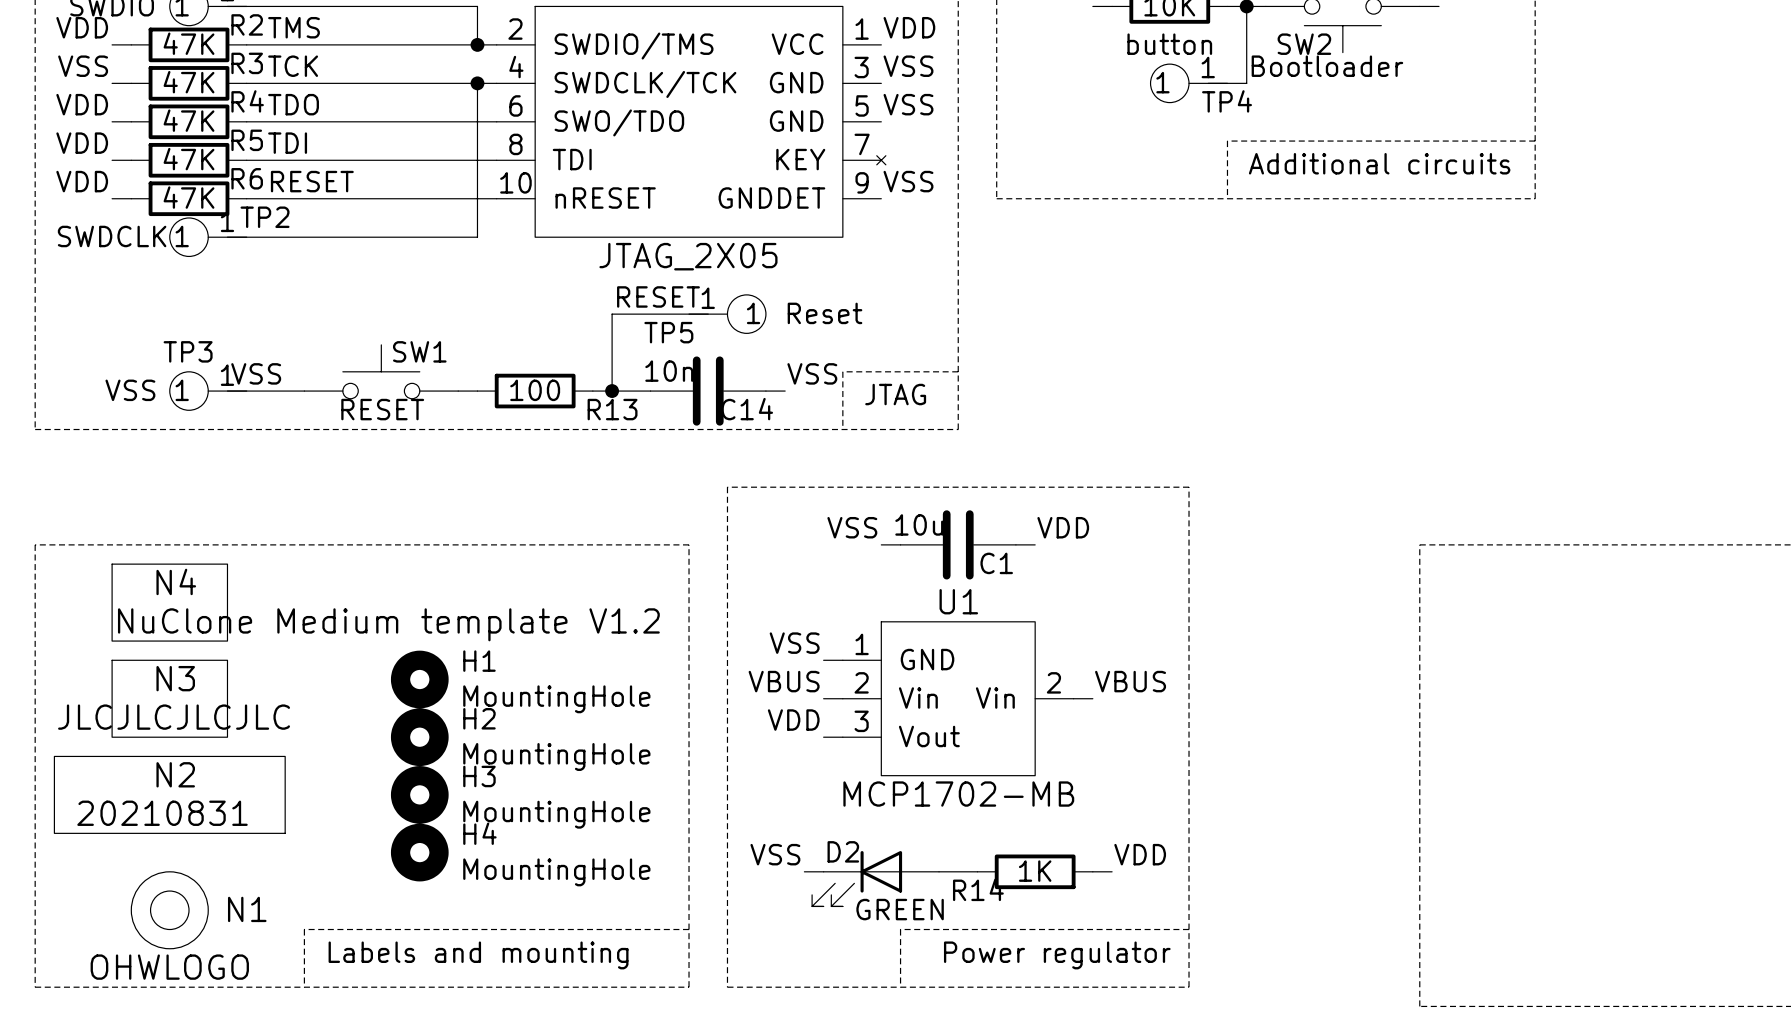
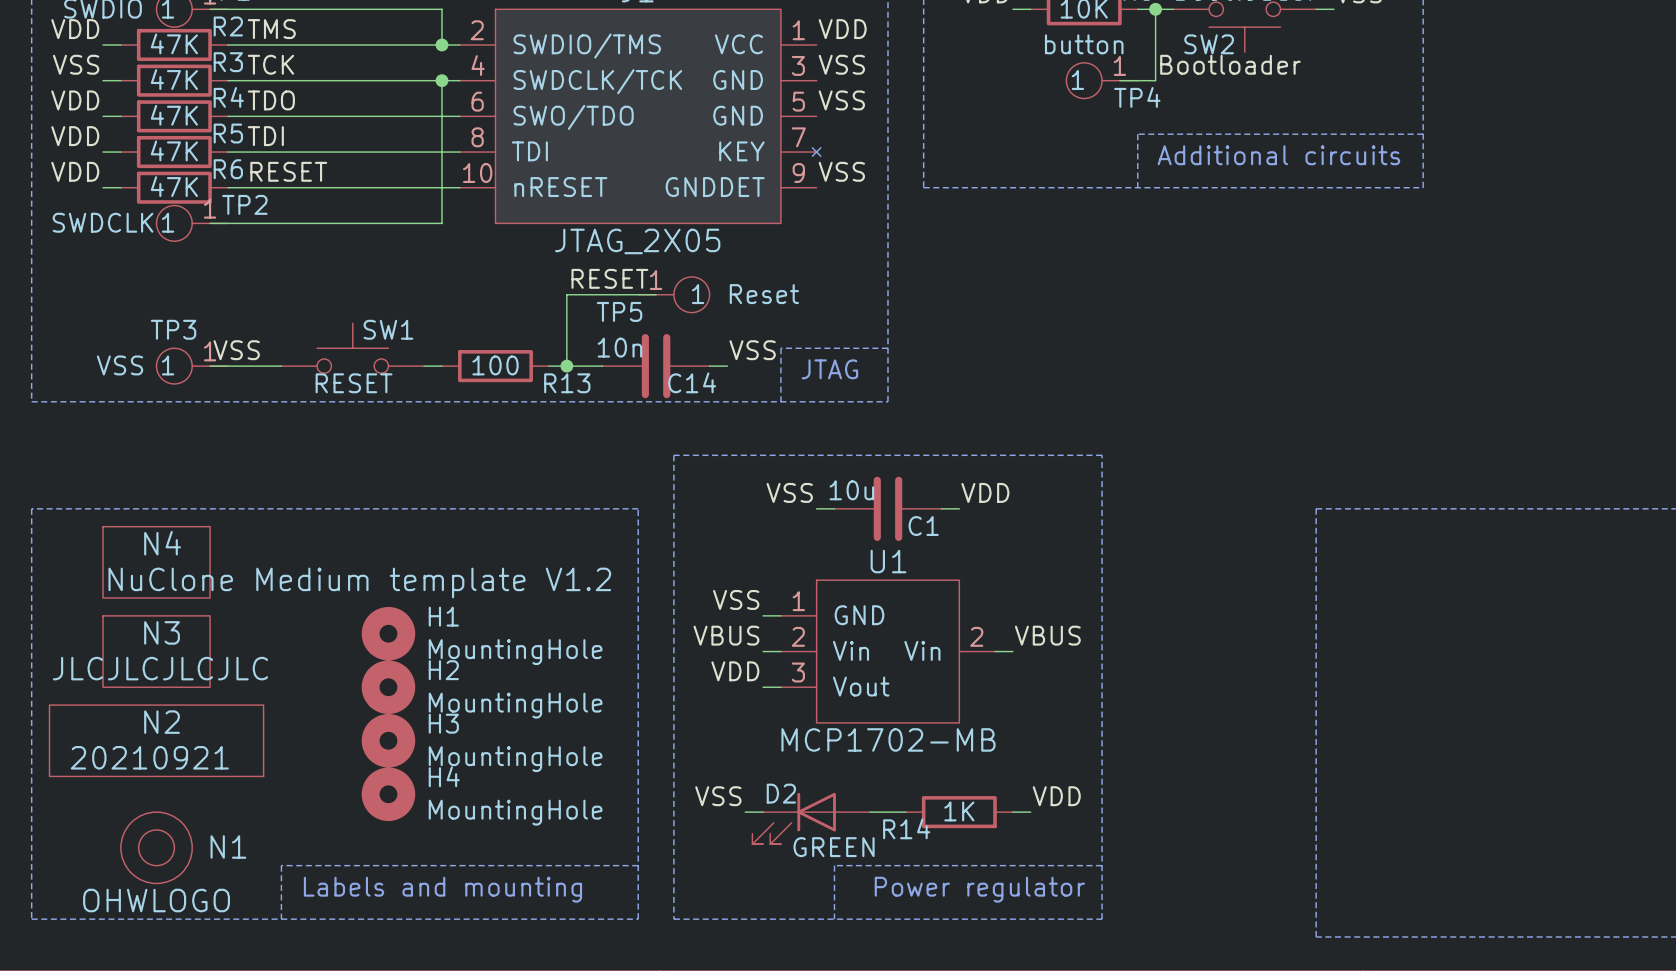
N2 value: 20210831 (162, 813) -> 20210921 (149, 757)

